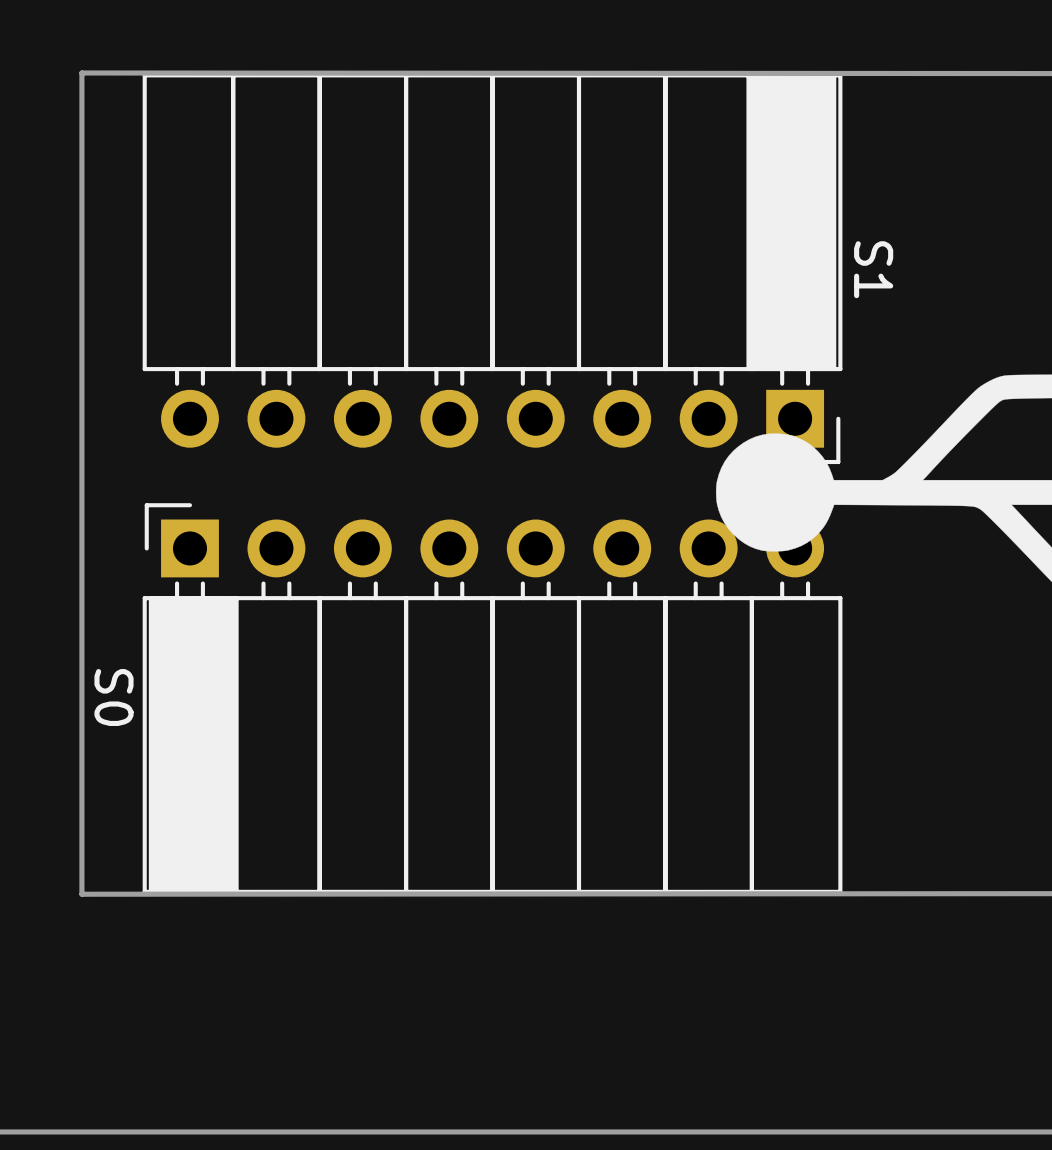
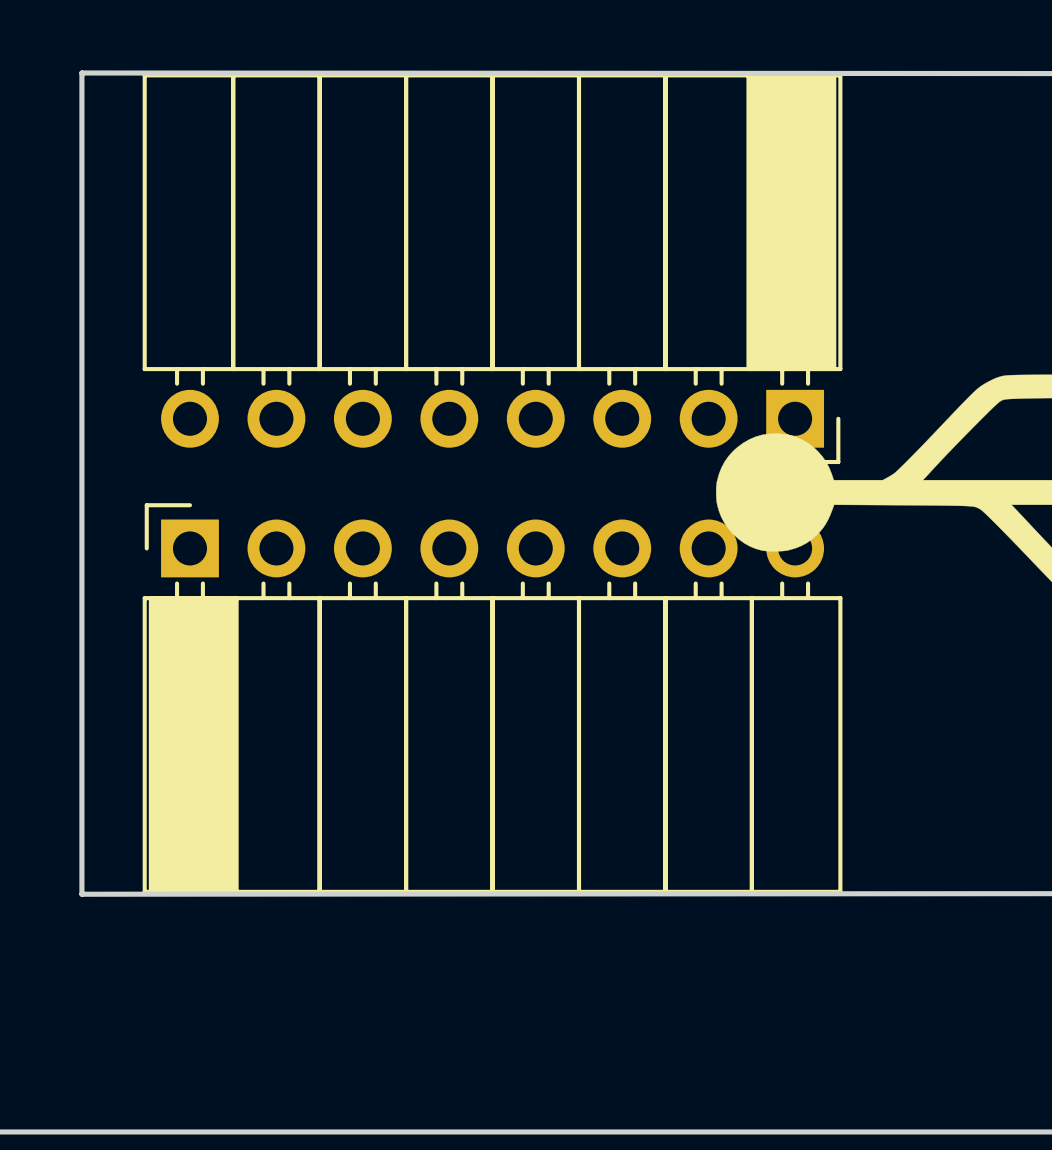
S1 name: S1 (873, 269) -> none
S0 name: S0 (114, 697) -> none

